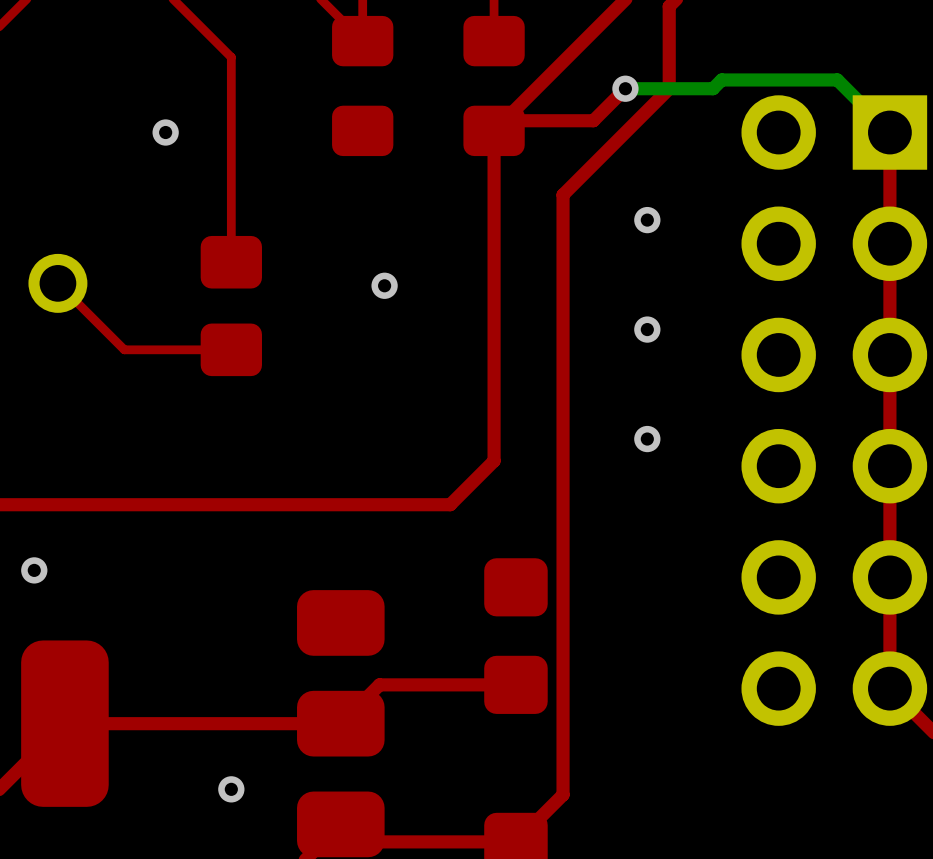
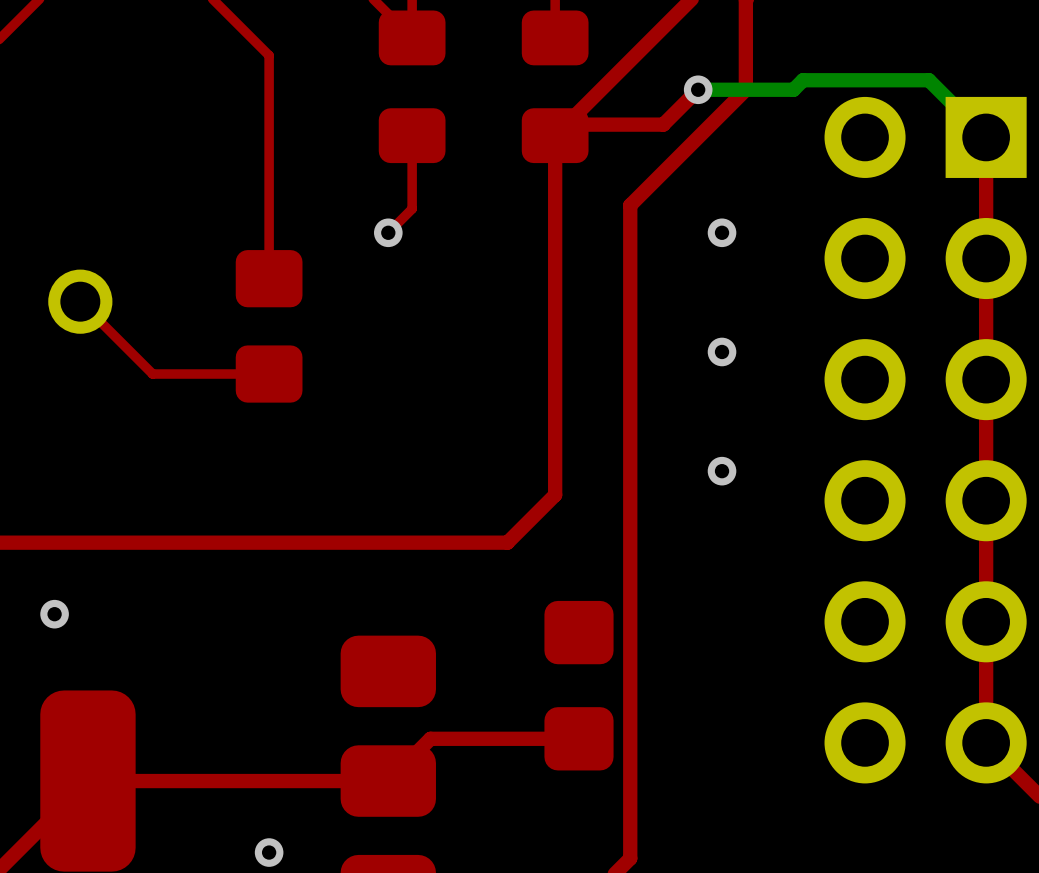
top track: none -> (412, 135) (412, 208) (388, 232)
via: (165, 132) -> none
via position: (384, 285) -> (388, 232)

